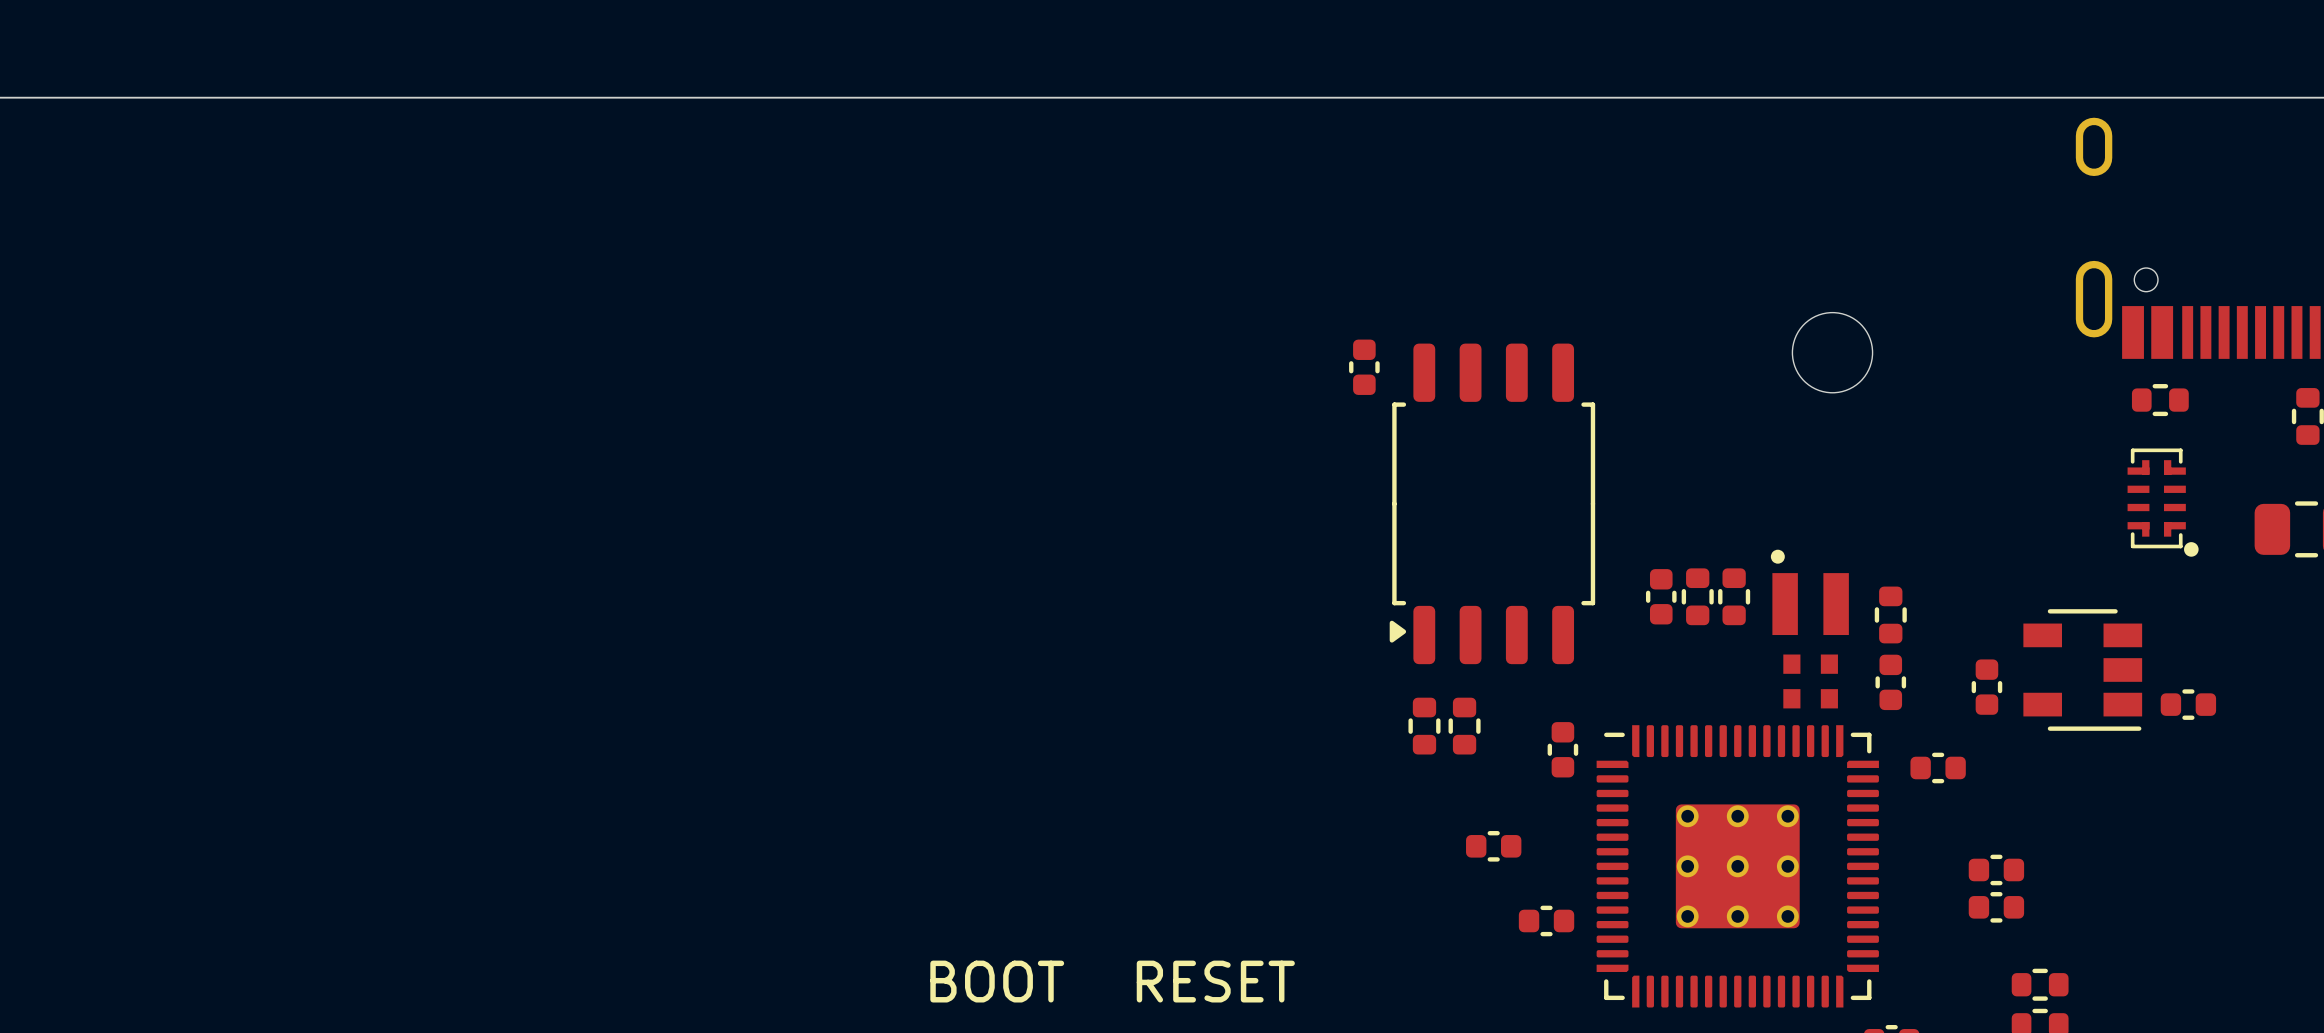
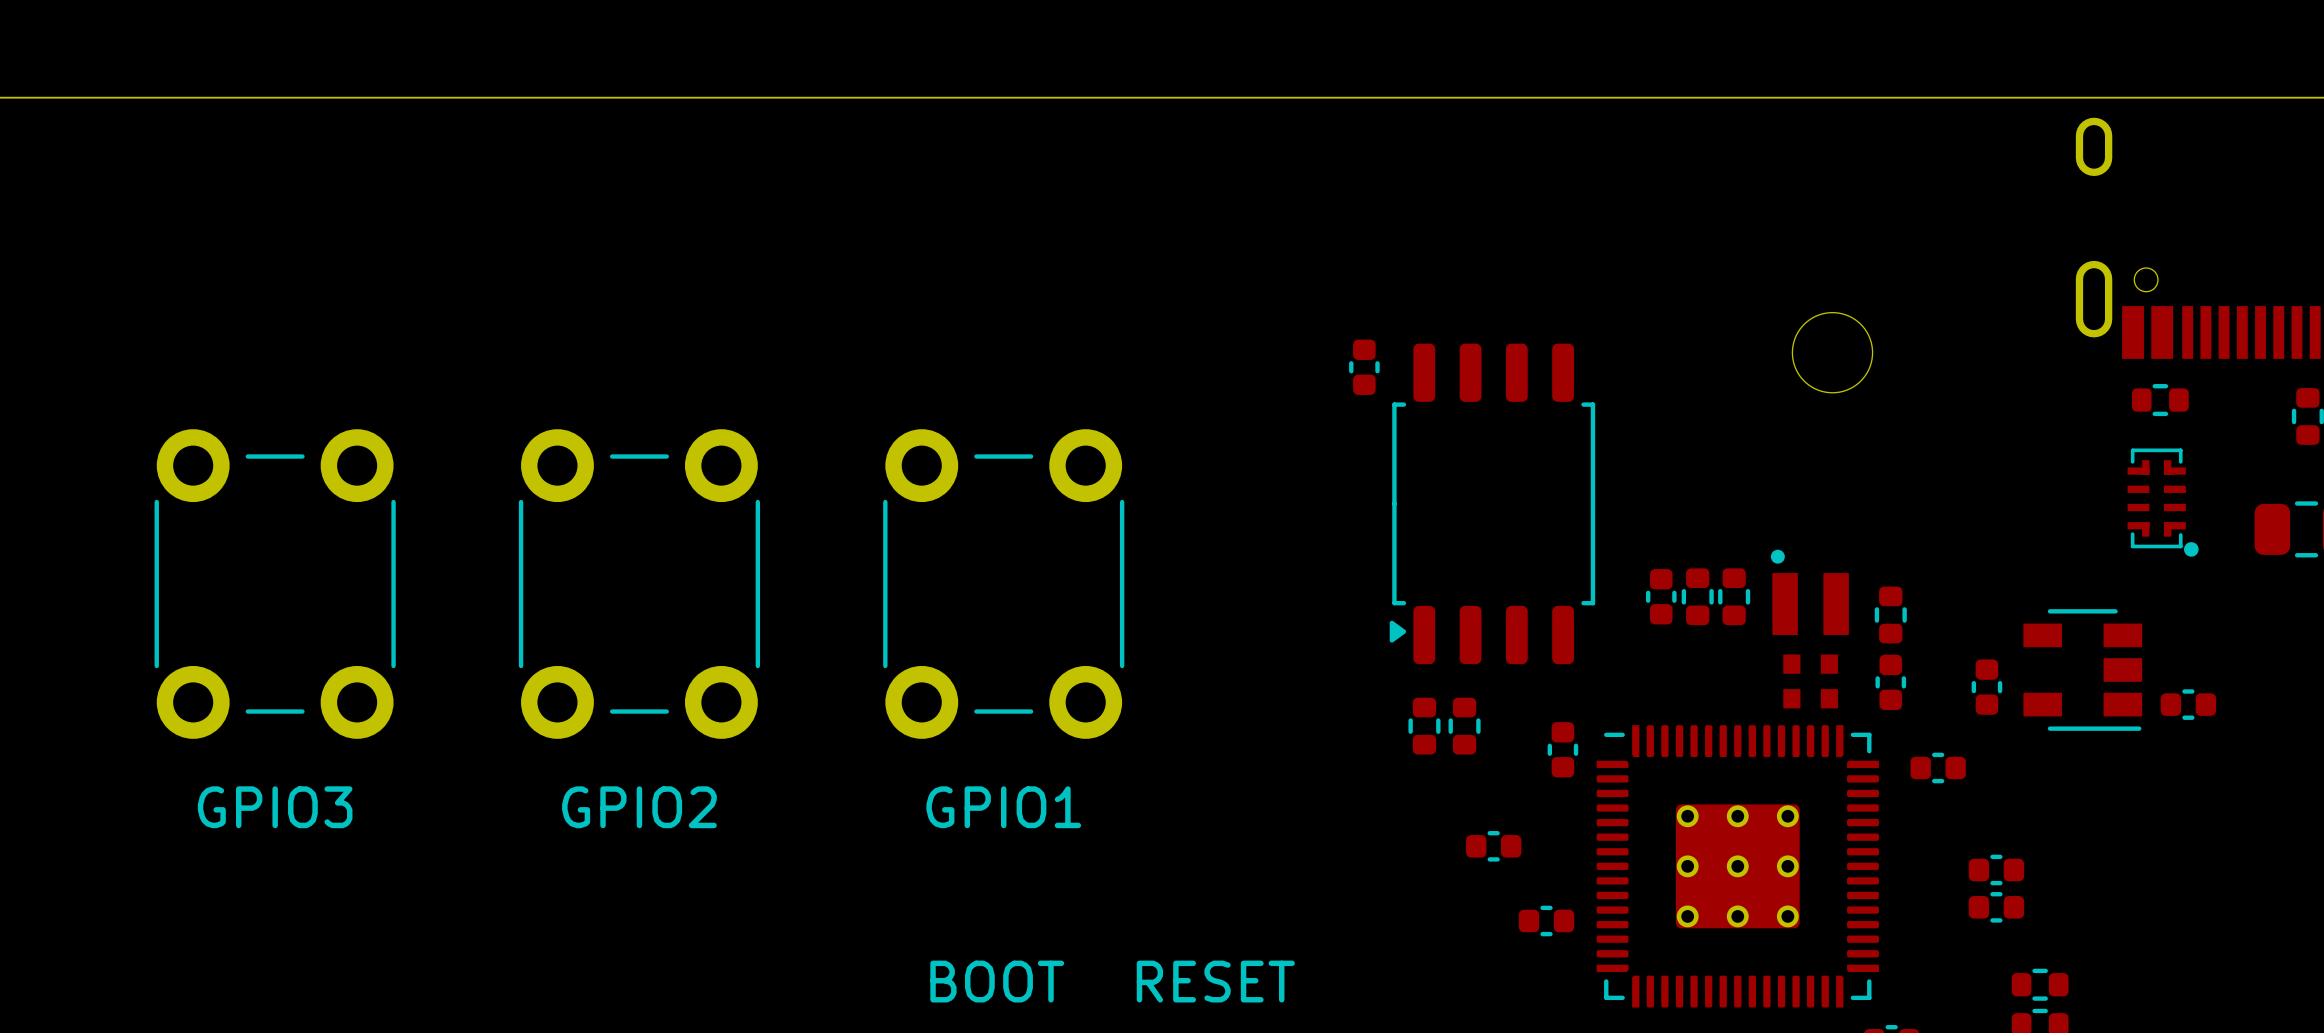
part: none -> (275, 584)
part: none -> (639, 584)
part: none -> (1003, 584)
text: none -> GPIO3 (275, 807)
text: none -> GPIO2 (639, 807)
text: none -> GPIO1 (1003, 807)

